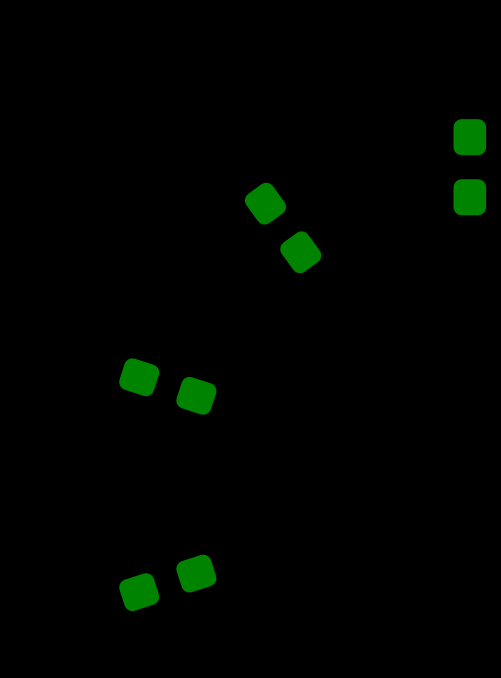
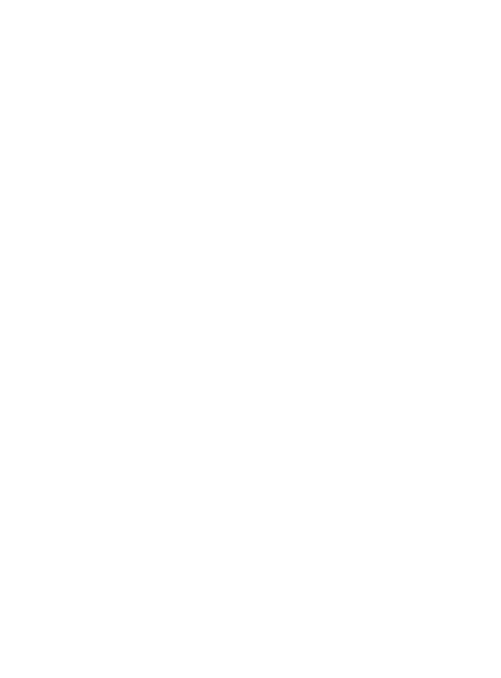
part: (469, 167) -> none
part: (283, 227) -> none
part: (167, 386) -> none
part: (167, 582) -> none

